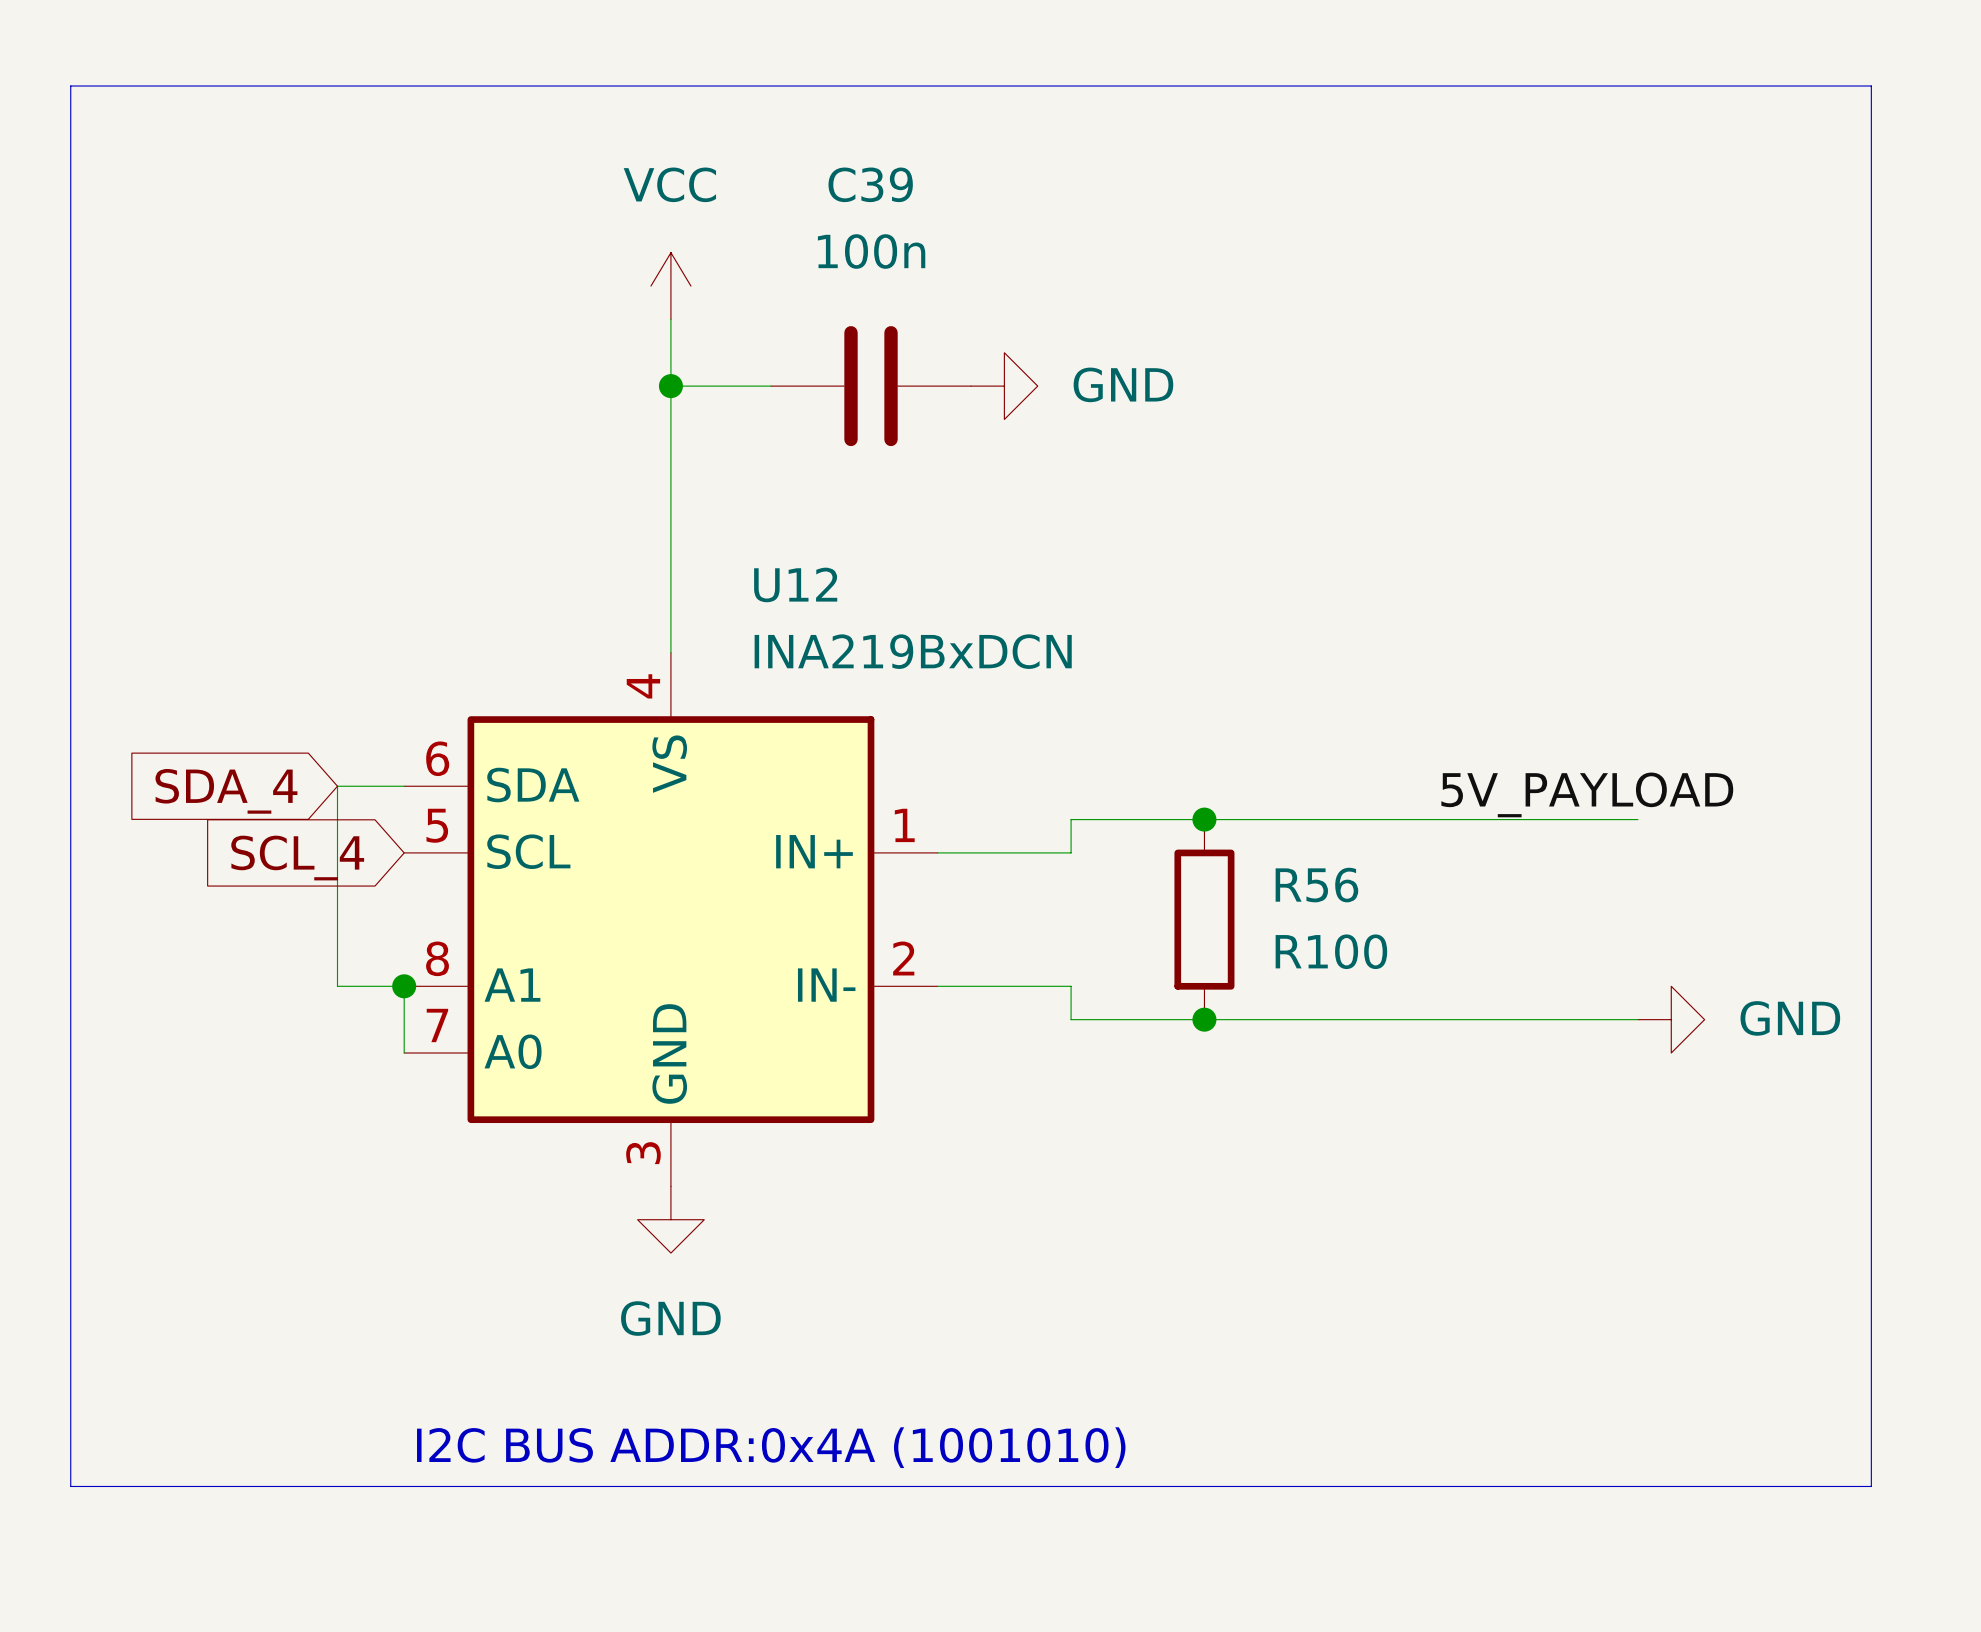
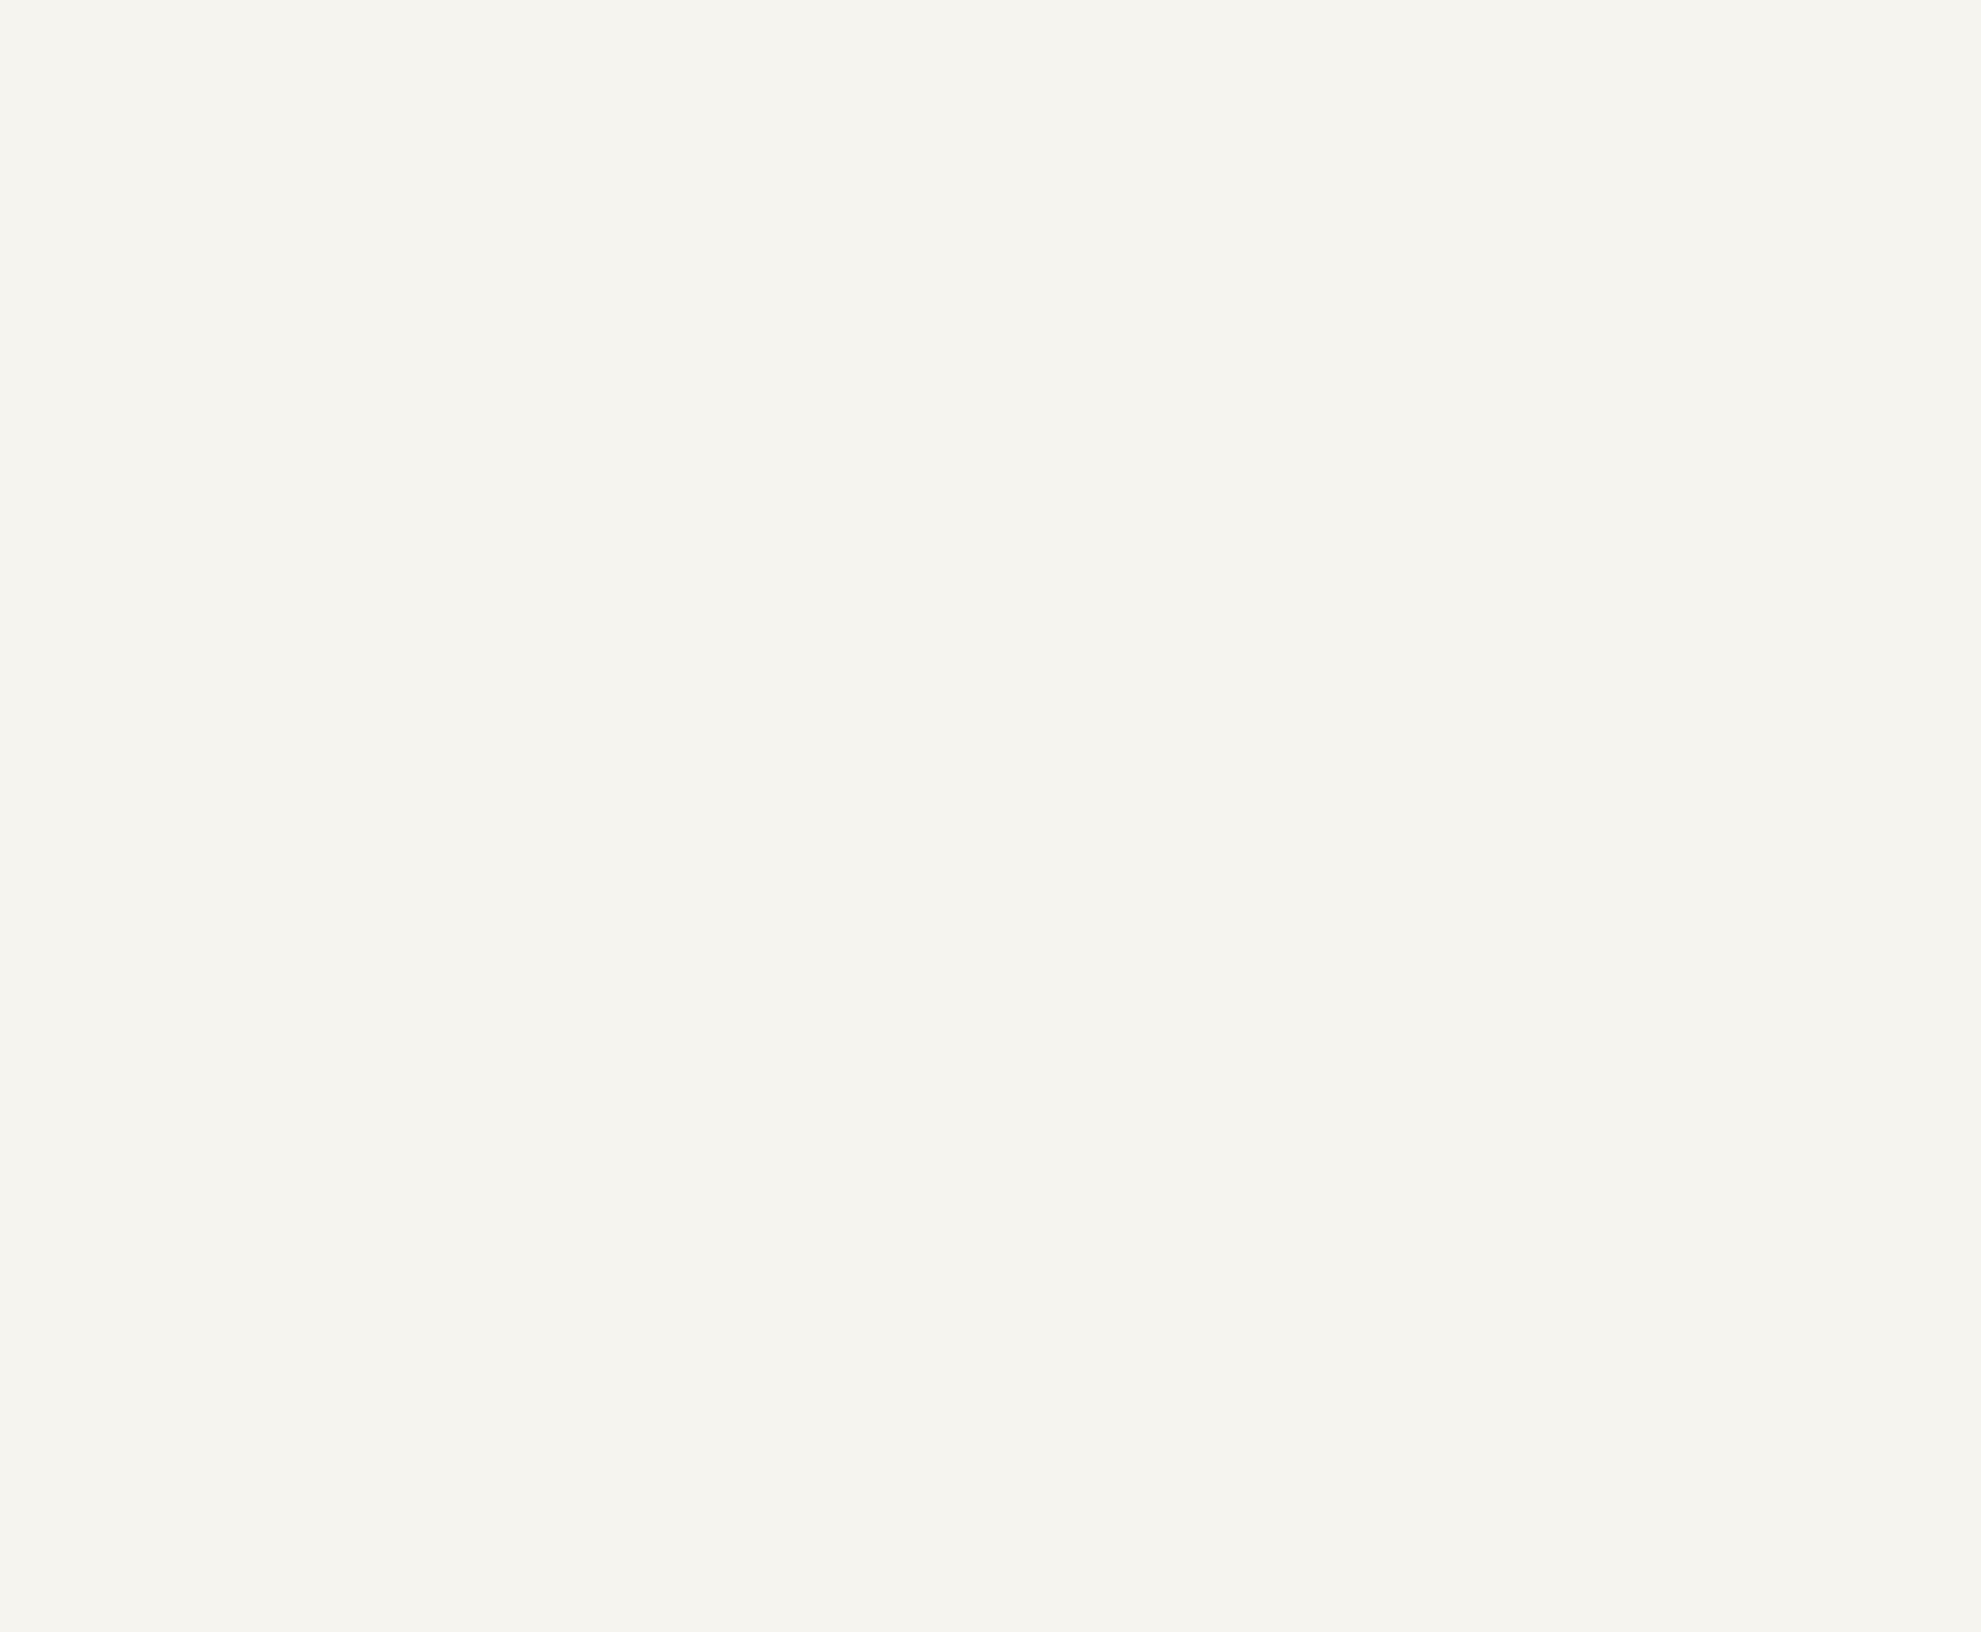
line: (70, 86) (1871, 86) (1871, 1486) (70, 1486) (70, 86) -> none
power symbol: VCC (670, 286) -> none
wire: (670, 319) (670, 652) -> none
wire: (670, 386) (770, 386) -> none
junction: (670, 386) -> none
C39: 100n (871, 386) -> none
power symbol: GND (1004, 386) -> none
wire: (404, 786) (337, 786) (337, 986) (404, 986) (404, 1052) -> none
global label: SDA_4 (226, 791) -> none
label: 5V_PAYLOAD (1587, 794) -> none
junction: (1204, 819) -> none
wire: (1637, 819) (1071, 819) (1071, 852) (937, 852) -> none
global label: SCL_4 (297, 858) -> none
U12: INA219BxDCN (670, 919) -> none
R56: R100 (1204, 919) -> none
junction: (404, 986) -> none
wire: (937, 986) (1071, 986) (1071, 1019) (1637, 1019) -> none
junction: (1204, 1019) -> none
power symbol: GND (1671, 1019) -> none
power symbol: GND (670, 1219) -> none
text: I2C BUS ADDR:0x4A (1001010) (771, 1447) -> none

